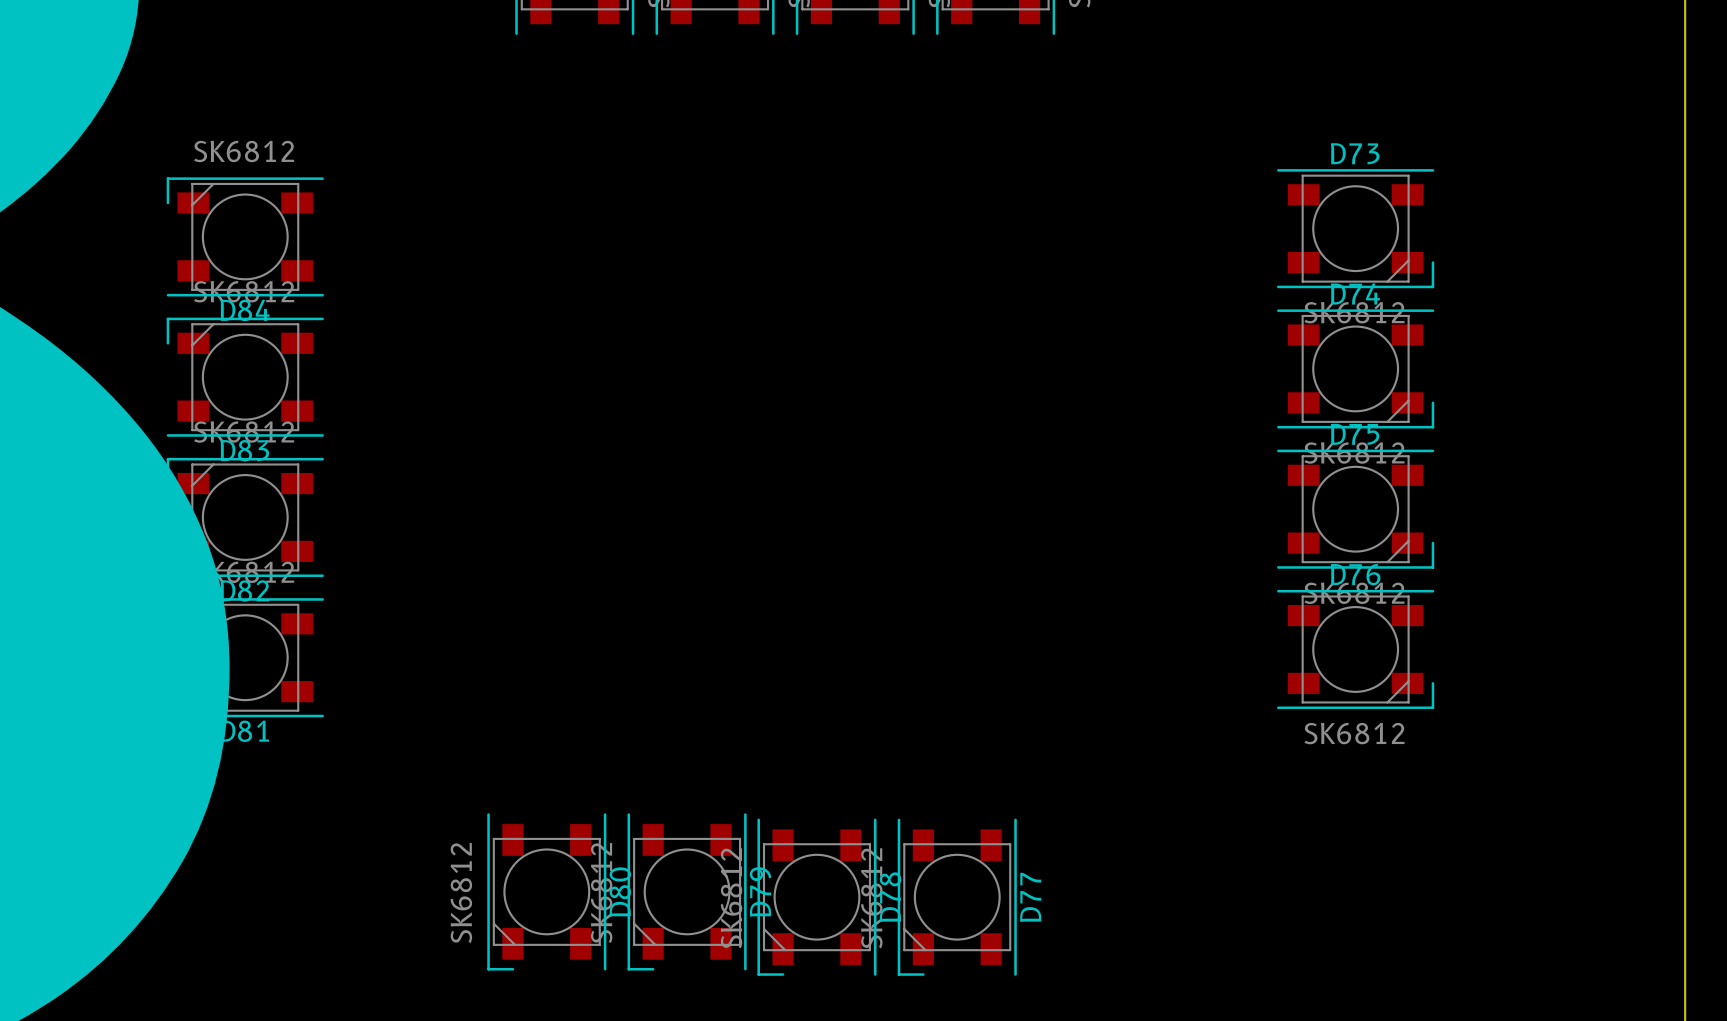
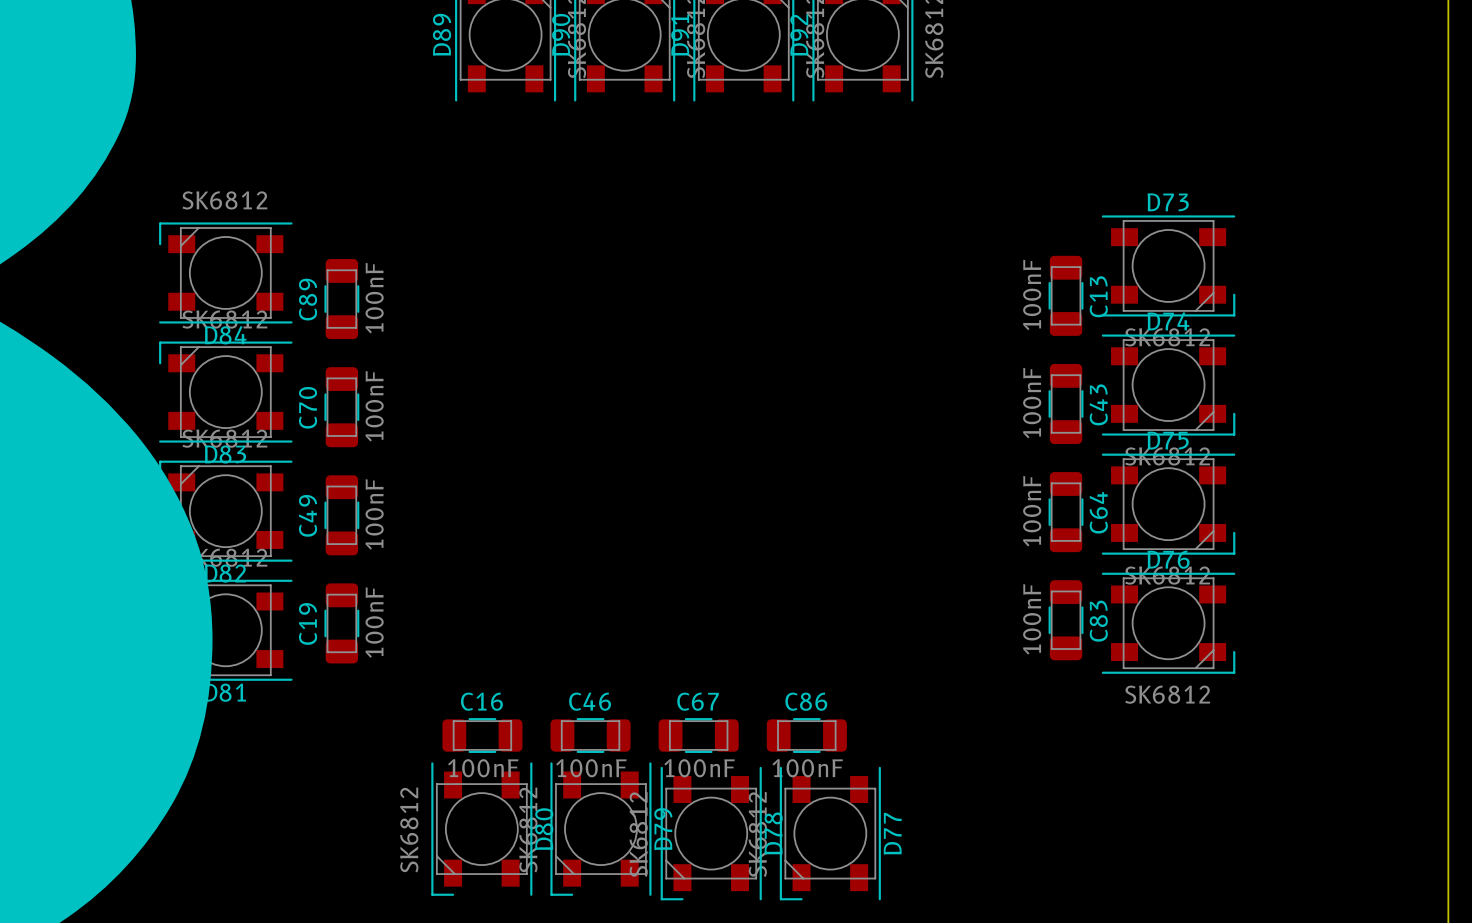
C13: none -> 100nF (1066, 295)
C89: none -> 100nF (341, 299)
C43: none -> 100nF (1066, 403)
C70: none -> 100nF (341, 407)
C64: none -> 100nF (1066, 512)
C49: none -> 100nF (341, 515)
C83: none -> 100nF (1066, 620)
C19: none -> 100nF (341, 623)
C16: none -> 100nF (482, 735)
C46: none -> 100nF (590, 735)
C67: none -> 100nF (698, 735)
C86: none -> 100nF (806, 735)

